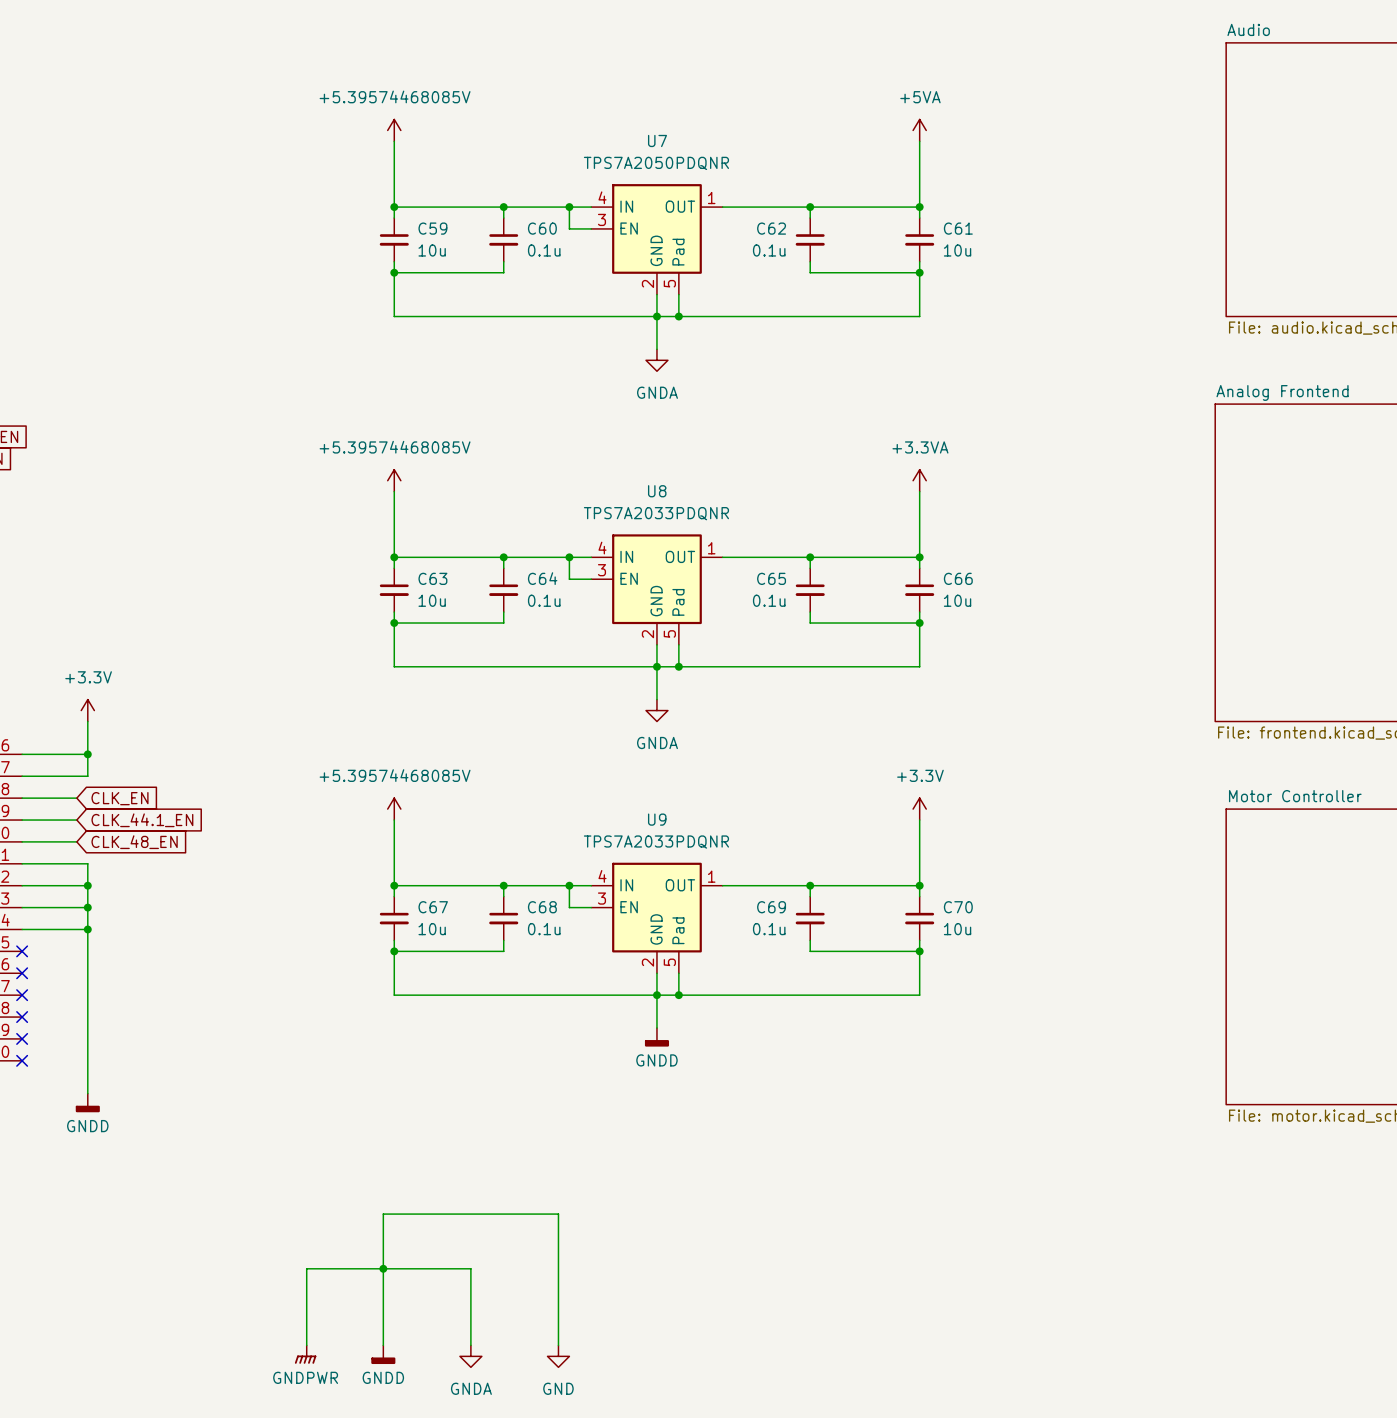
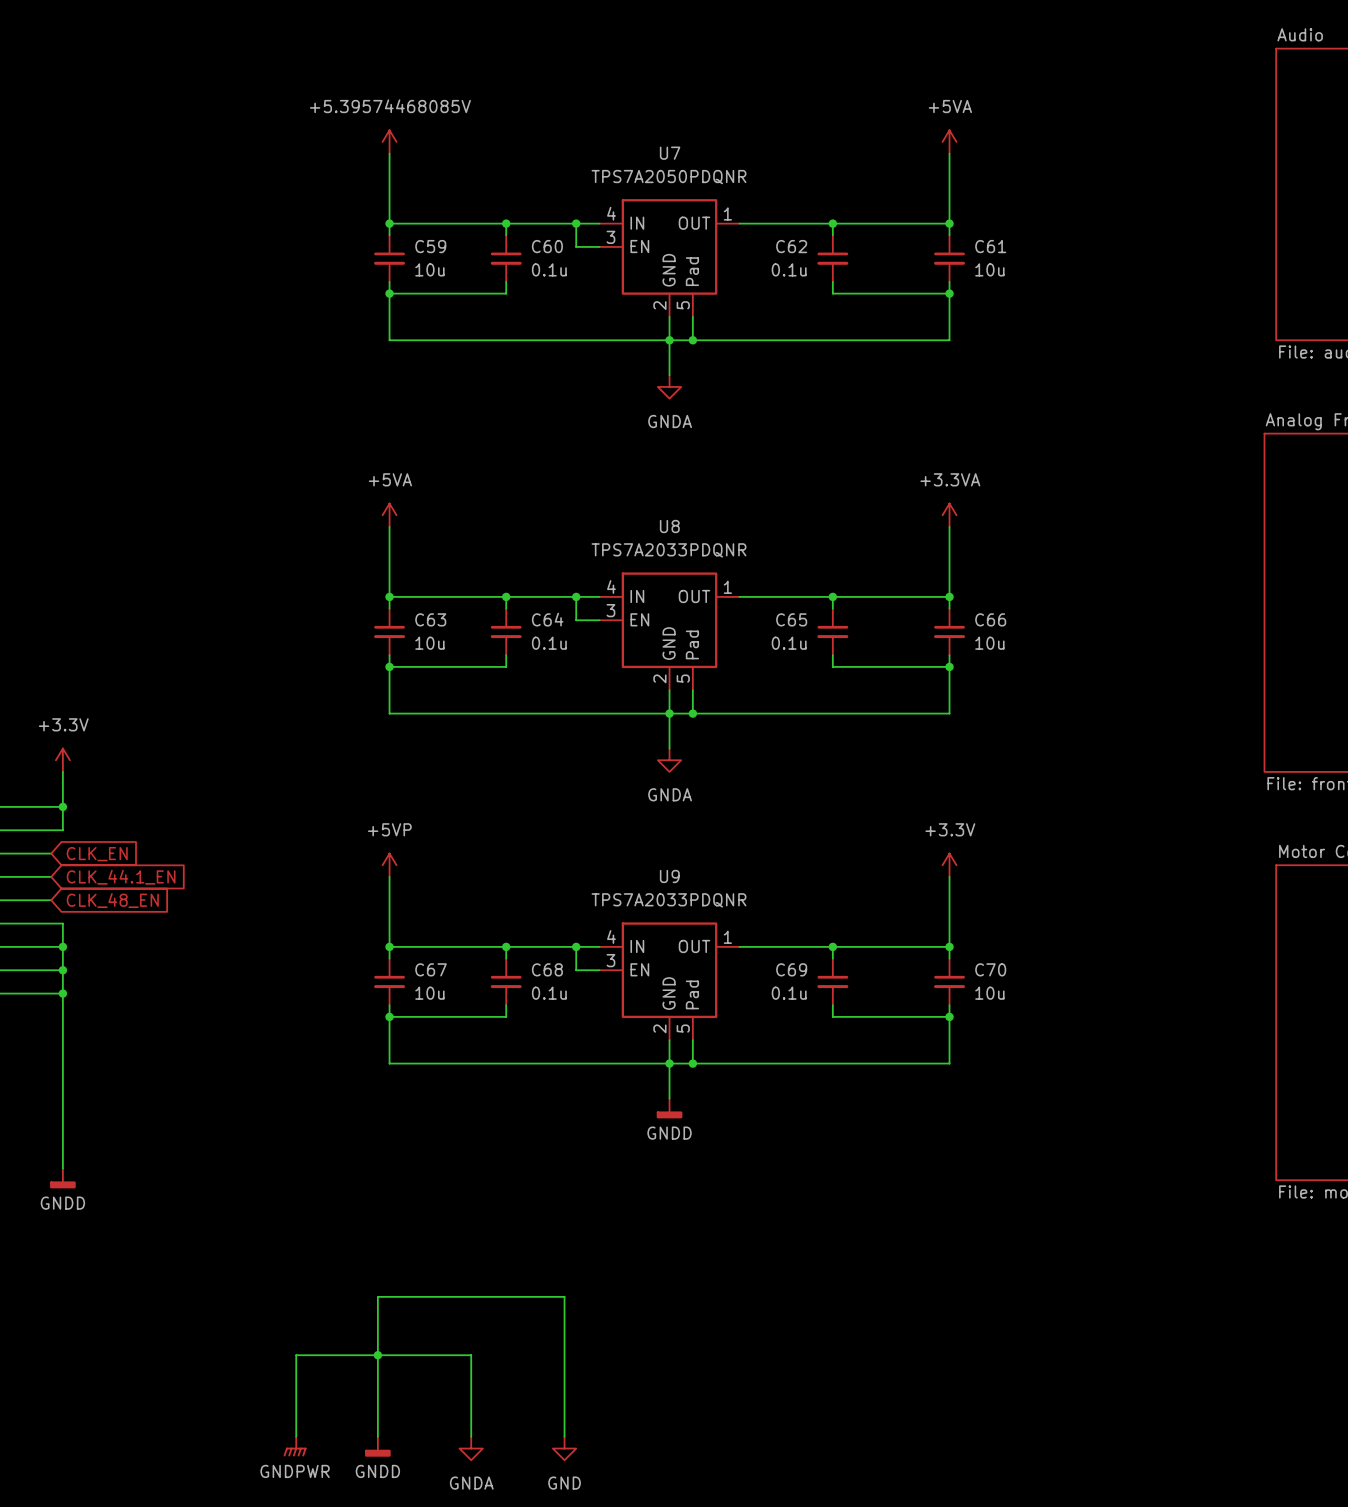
power symbol: +5.39574468085V (394, 480) -> +5VA (389, 515)
power symbol: +5.39574468085V (394, 809) -> +5VP (389, 865)

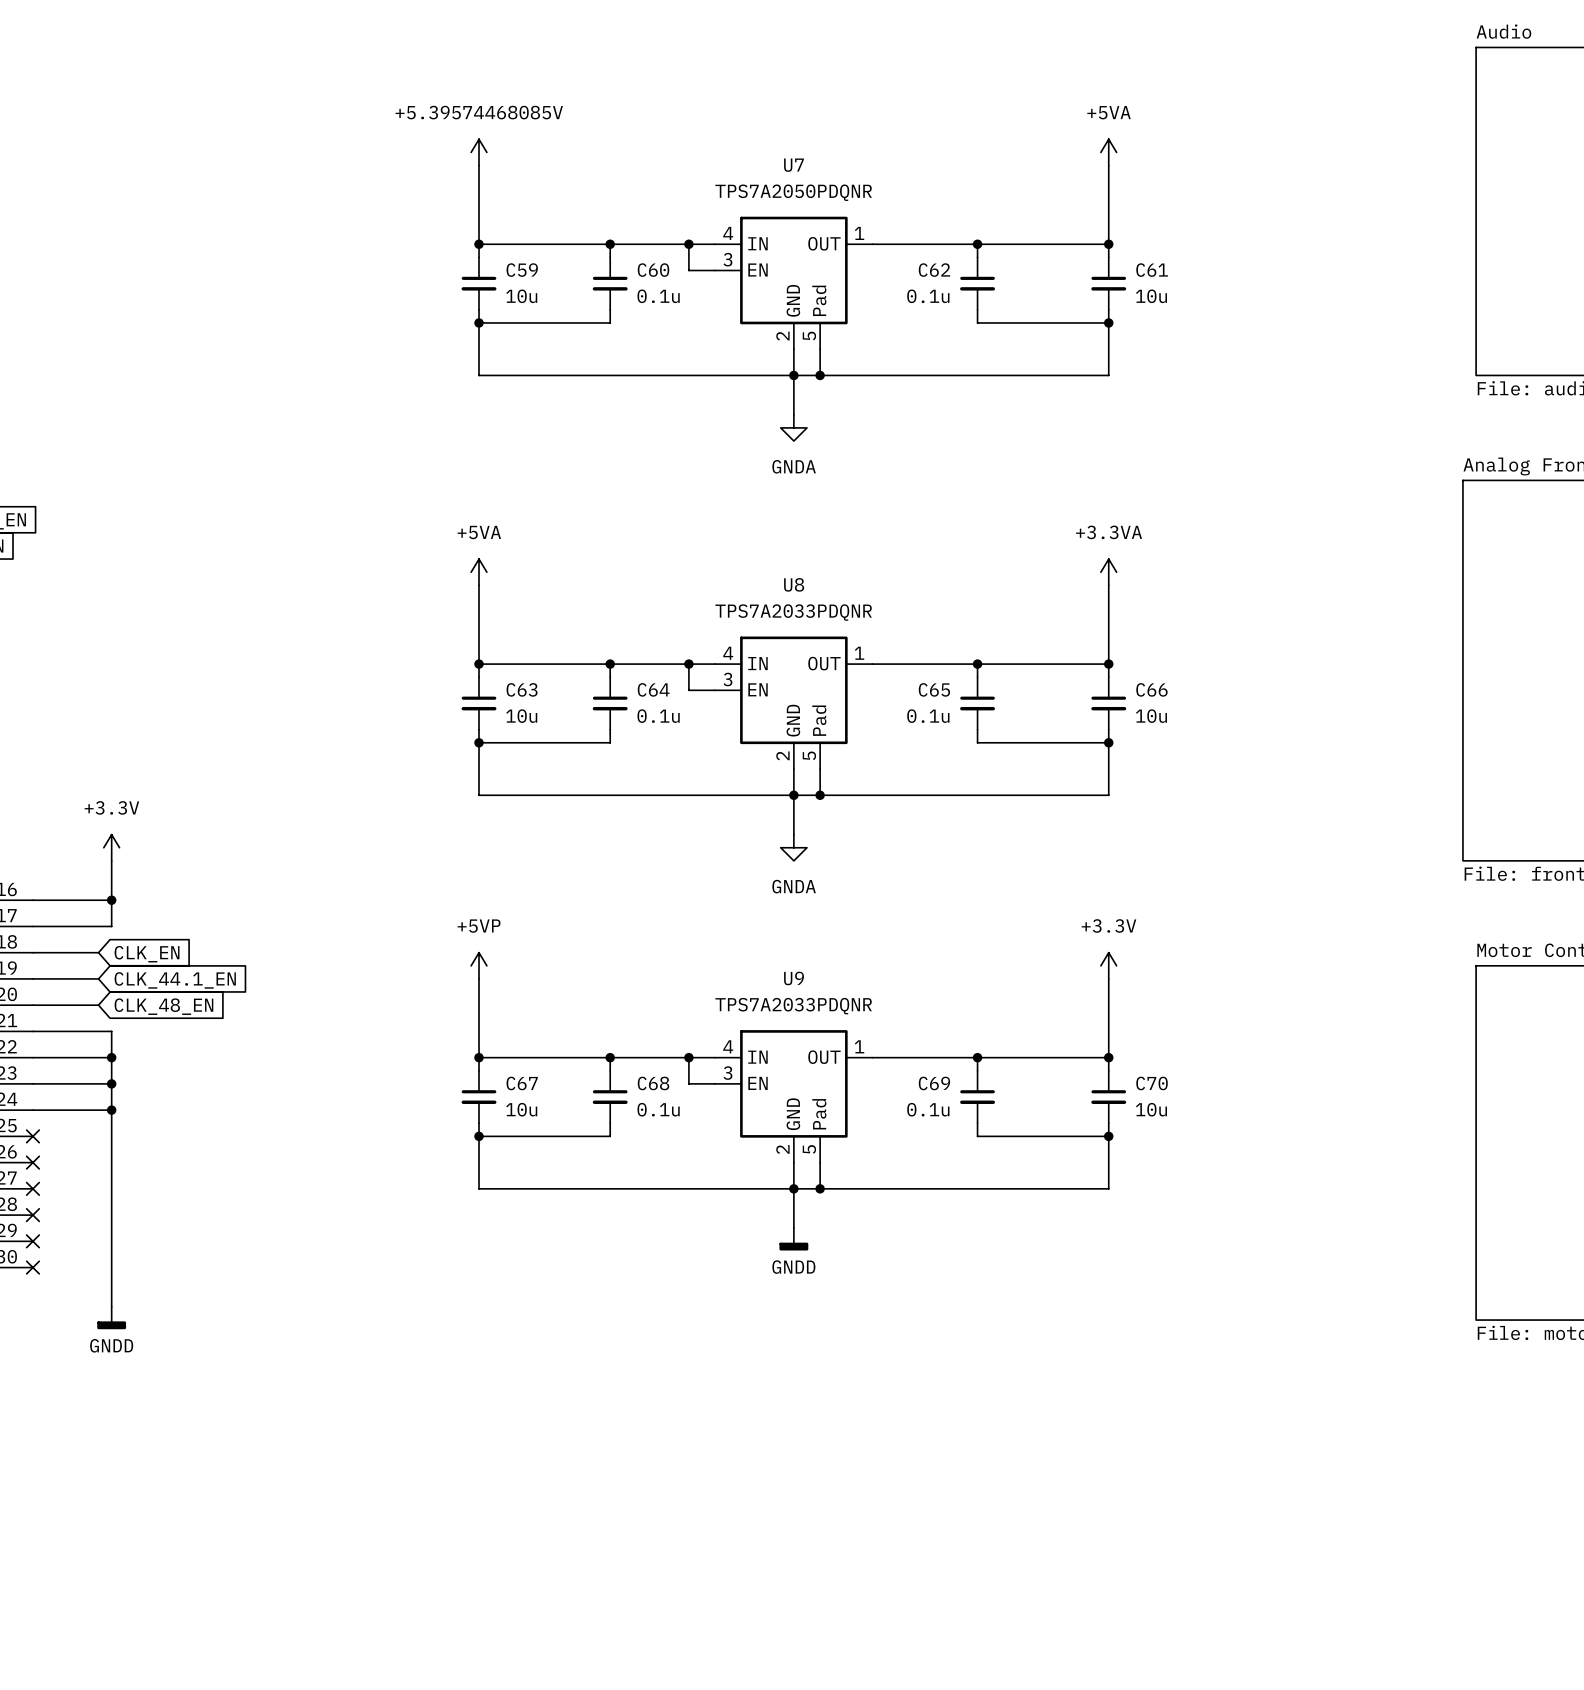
junction: (377, 1355) -> none
wire: (296, 1436) (296, 1355) (471, 1355) (471, 1436) -> none
wire: (377, 1436) (377, 1296) (564, 1296) (564, 1436) -> none
power symbol: GNDPWR (295, 1446) -> none
power symbol: GNDD (377, 1446) -> none
power symbol: GNDA (471, 1448) -> none
power symbol: GND (564, 1448) -> none

